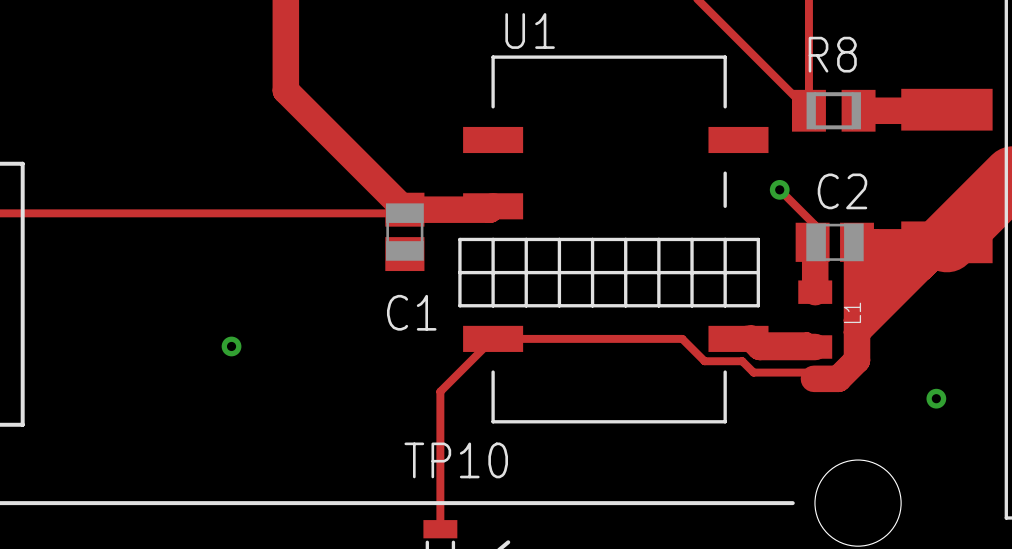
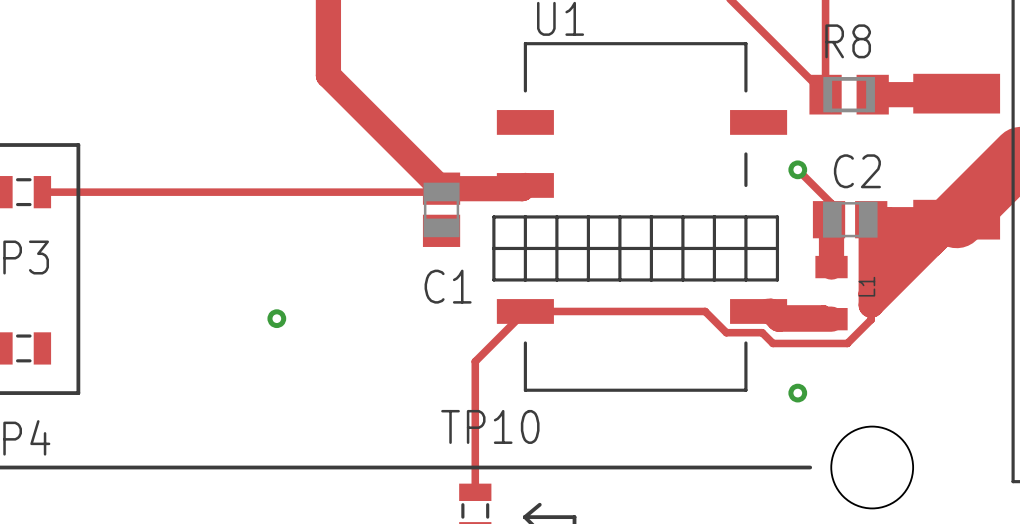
track: (857, 332) (857, 360) (838, 378) (813, 378) -> none
via: (936, 398) -> none
via: none -> (797, 393)

